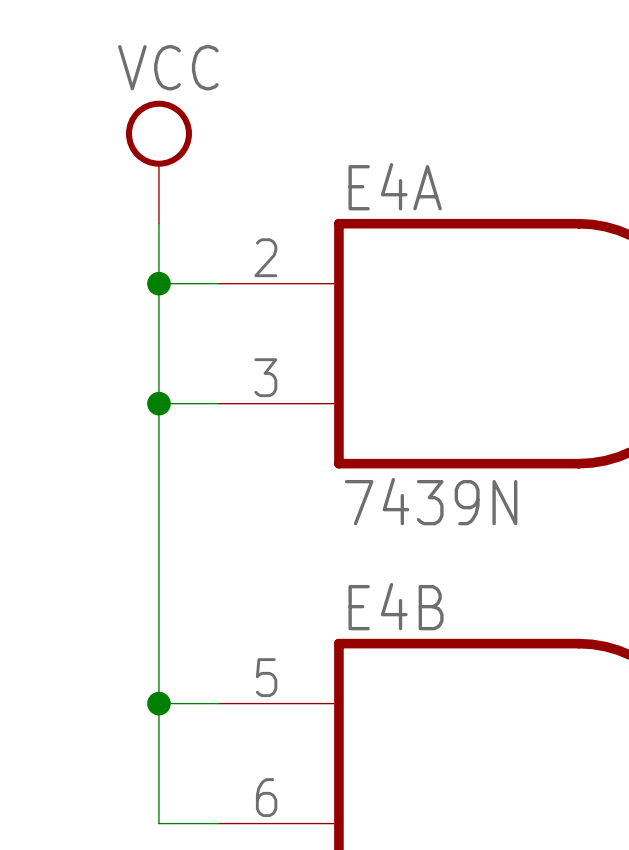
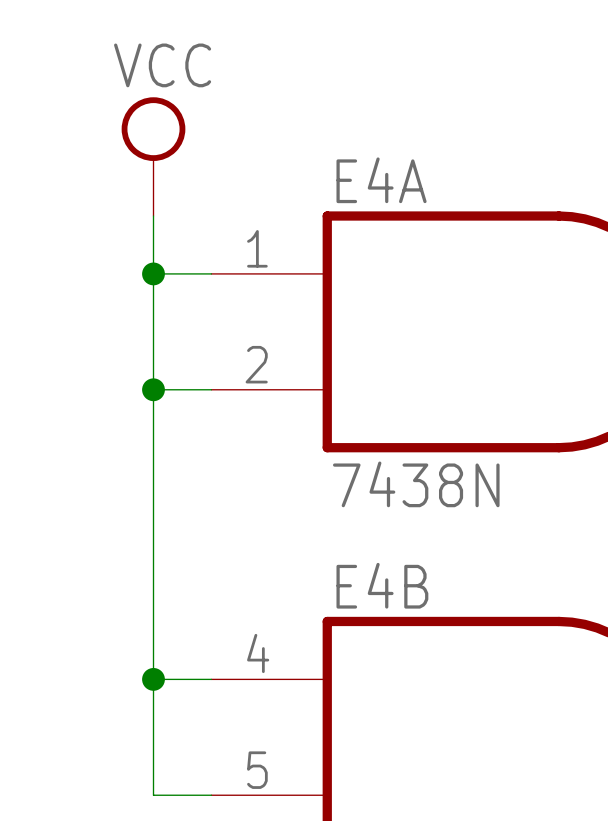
E4A pin number: 2 (265, 257) -> 1 (257, 248)
E4A pin number: 3 (265, 377) -> 2 (256, 364)
E4A value: 7439N (431, 501) -> 7438N (416, 484)
E4B pin number: 5 (266, 677) -> 4 (258, 653)
E4B pin number: 6 (266, 797) -> 5 (257, 770)

